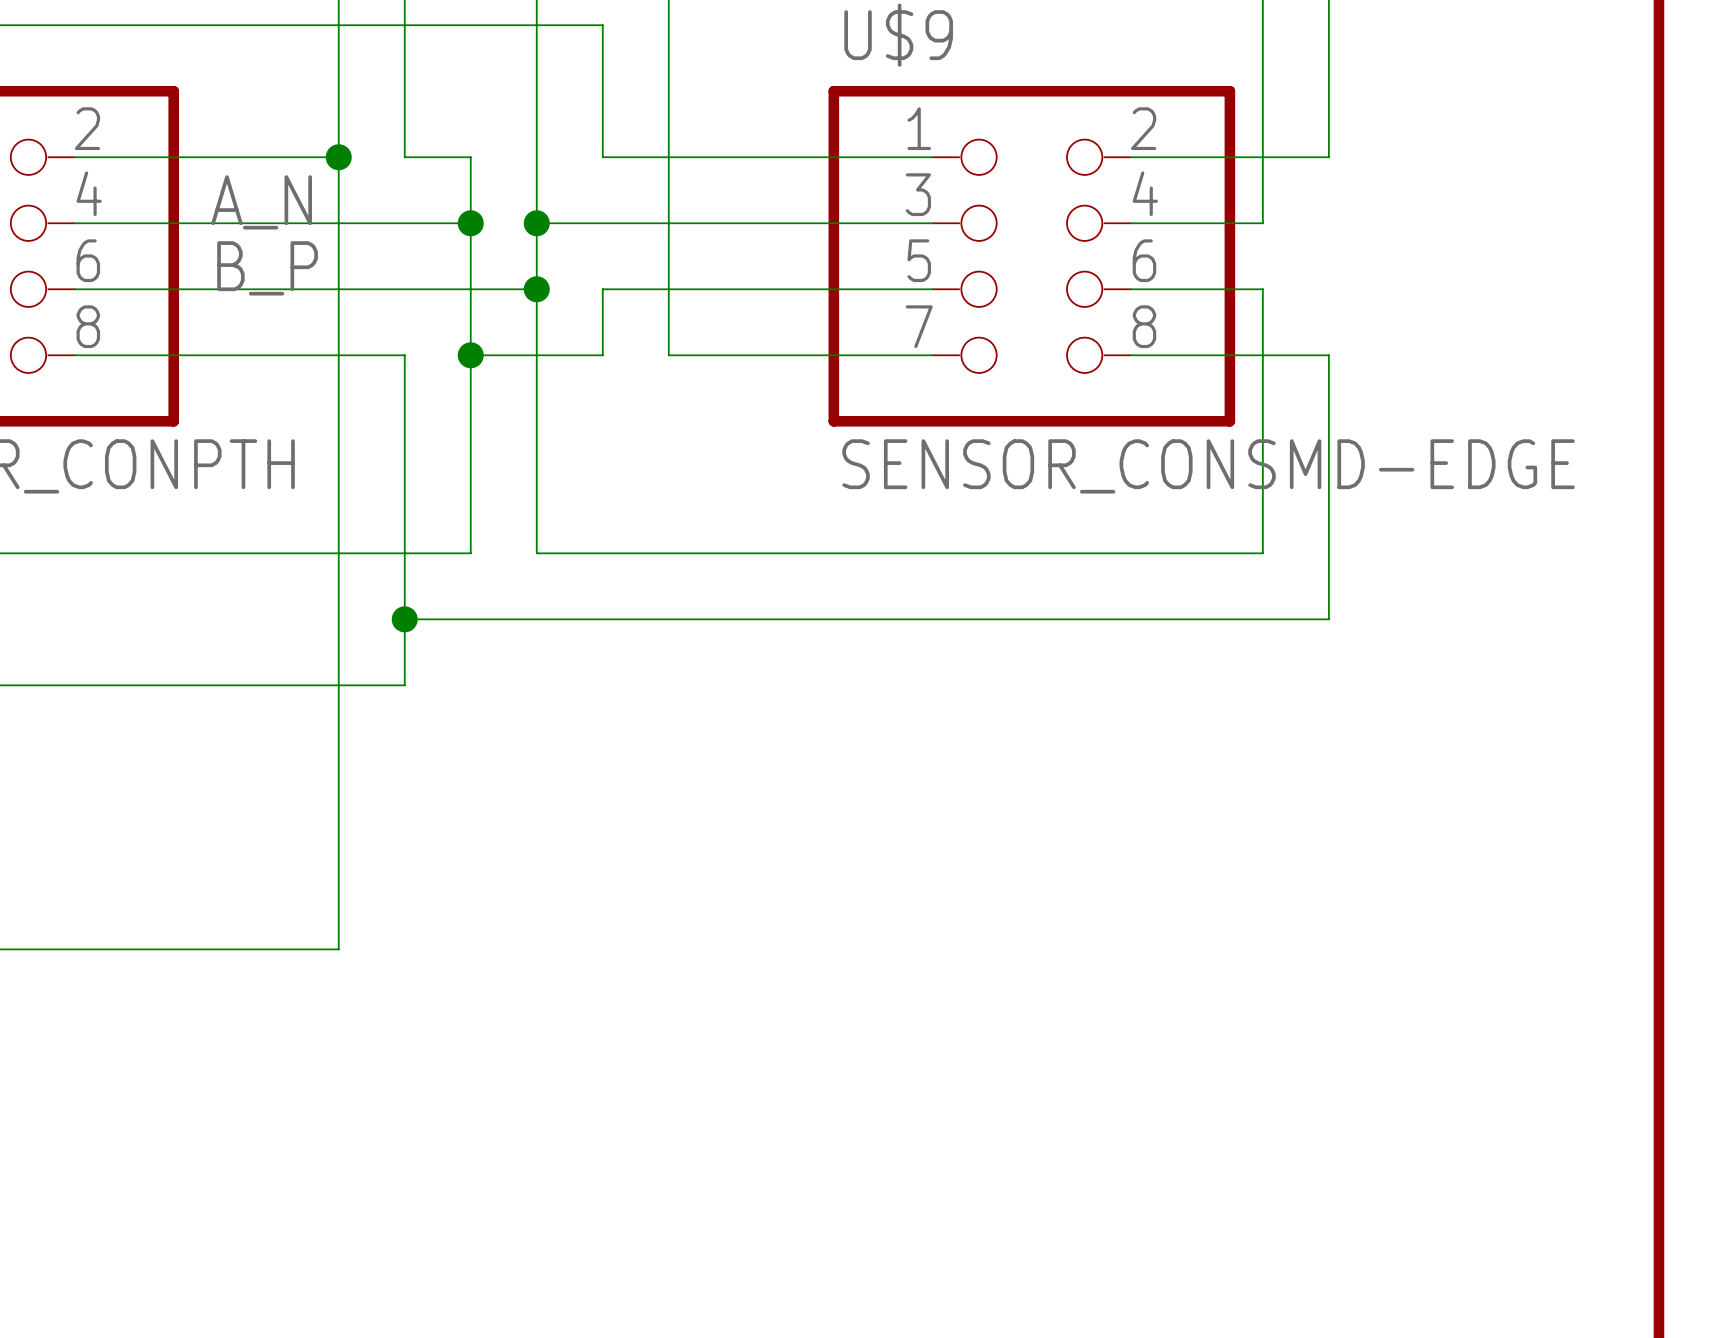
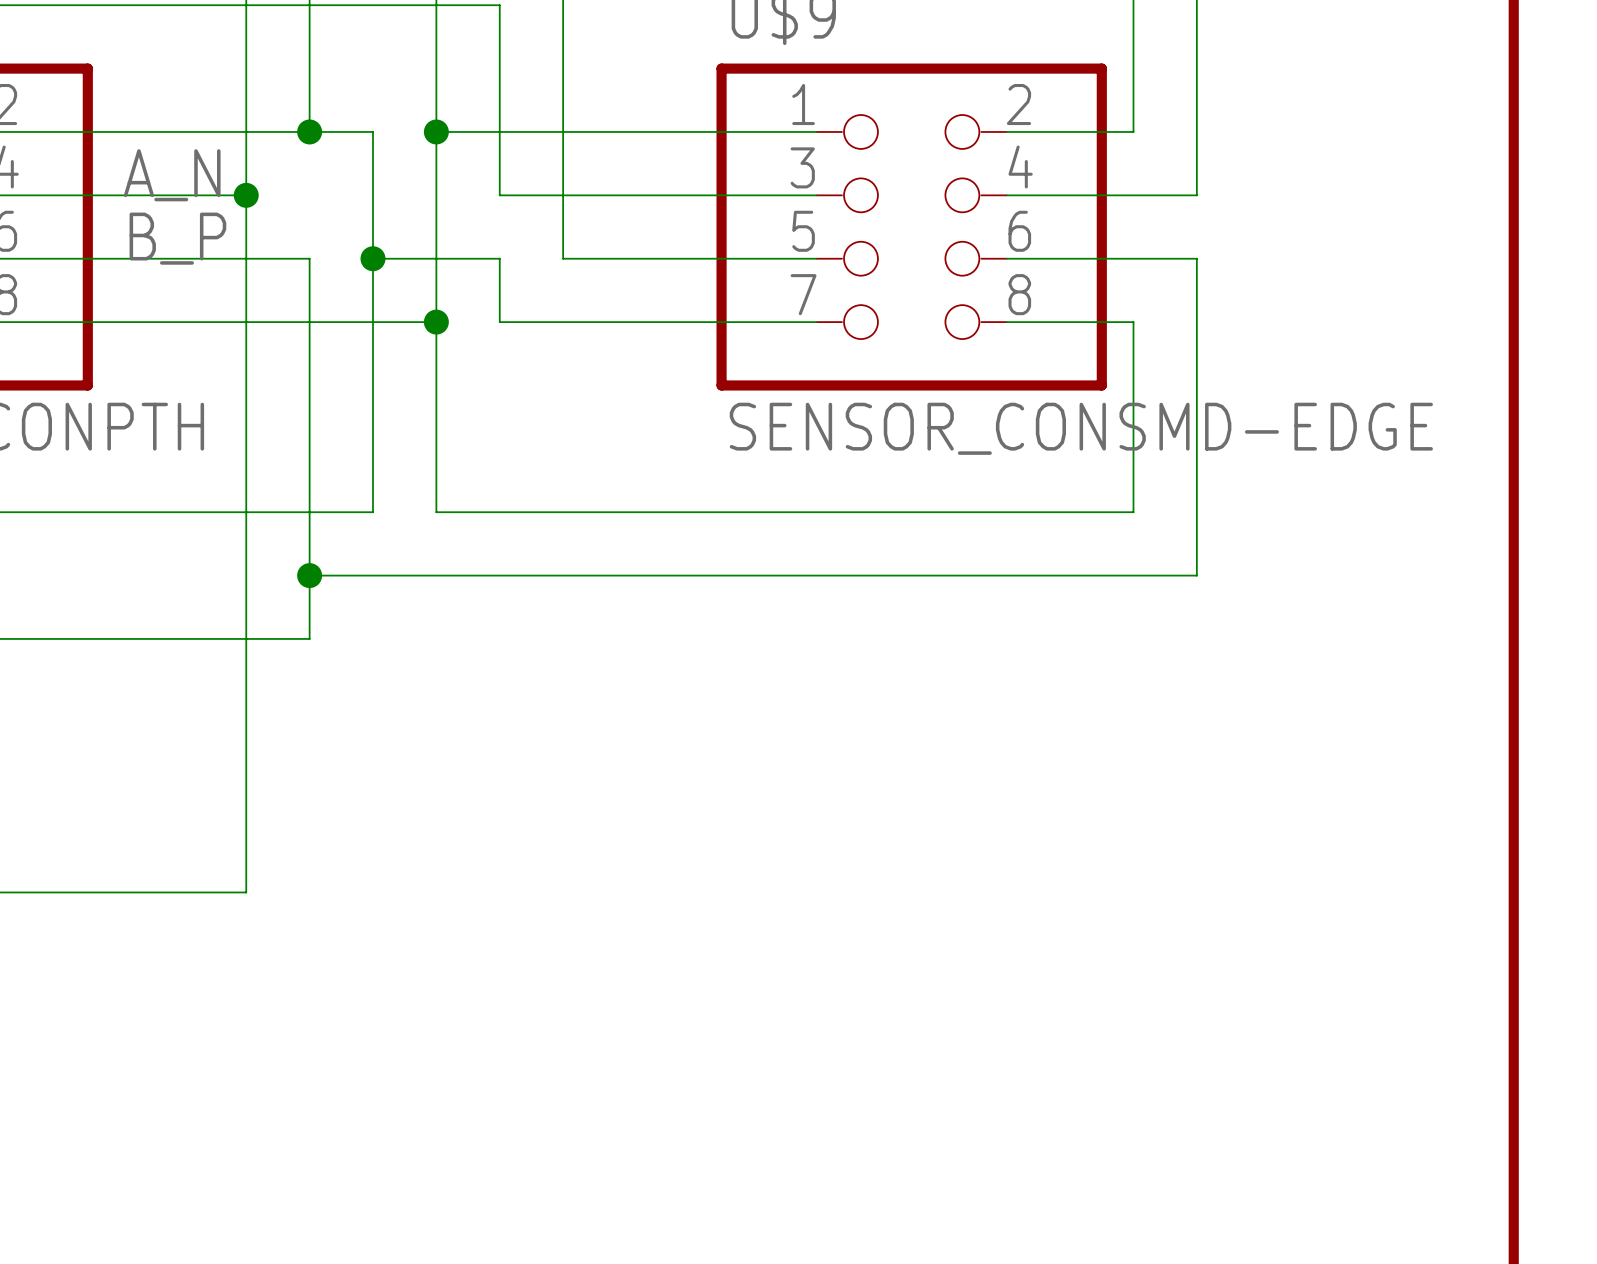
wire: none -> (246, 131) (309, 131)
junction: (338, 157) -> none
junction: none -> (309, 131)
junction: none -> (436, 131)
wire: (1328, 157) (1262, 157) (1262, 223) -> (1196, 131) (1196, 195) (1133, 195)
wire: (338, 223) (470, 223) -> none
junction: none -> (246, 195)
junction: (470, 223) -> none
wire: (536, 223) (602, 223) -> (436, 131) (499, 131) (499, 195)
junction: (536, 223) -> none
wire: (404, 289) (470, 289) -> (309, 258) (309, 322) (373, 322)
junction: none -> (373, 258)
junction: (536, 289) -> none
wire: (602, 289) (668, 289) (668, 355) -> (499, 322) (563, 322)
wire: (1262, 289) (1262, 355) (1328, 355) -> (1133, 258) (1196, 258) (1196, 322)
junction: (470, 355) -> none
wire: (536, 355) (602, 355) -> (436, 258) (499, 258)
junction: none -> (436, 322)

